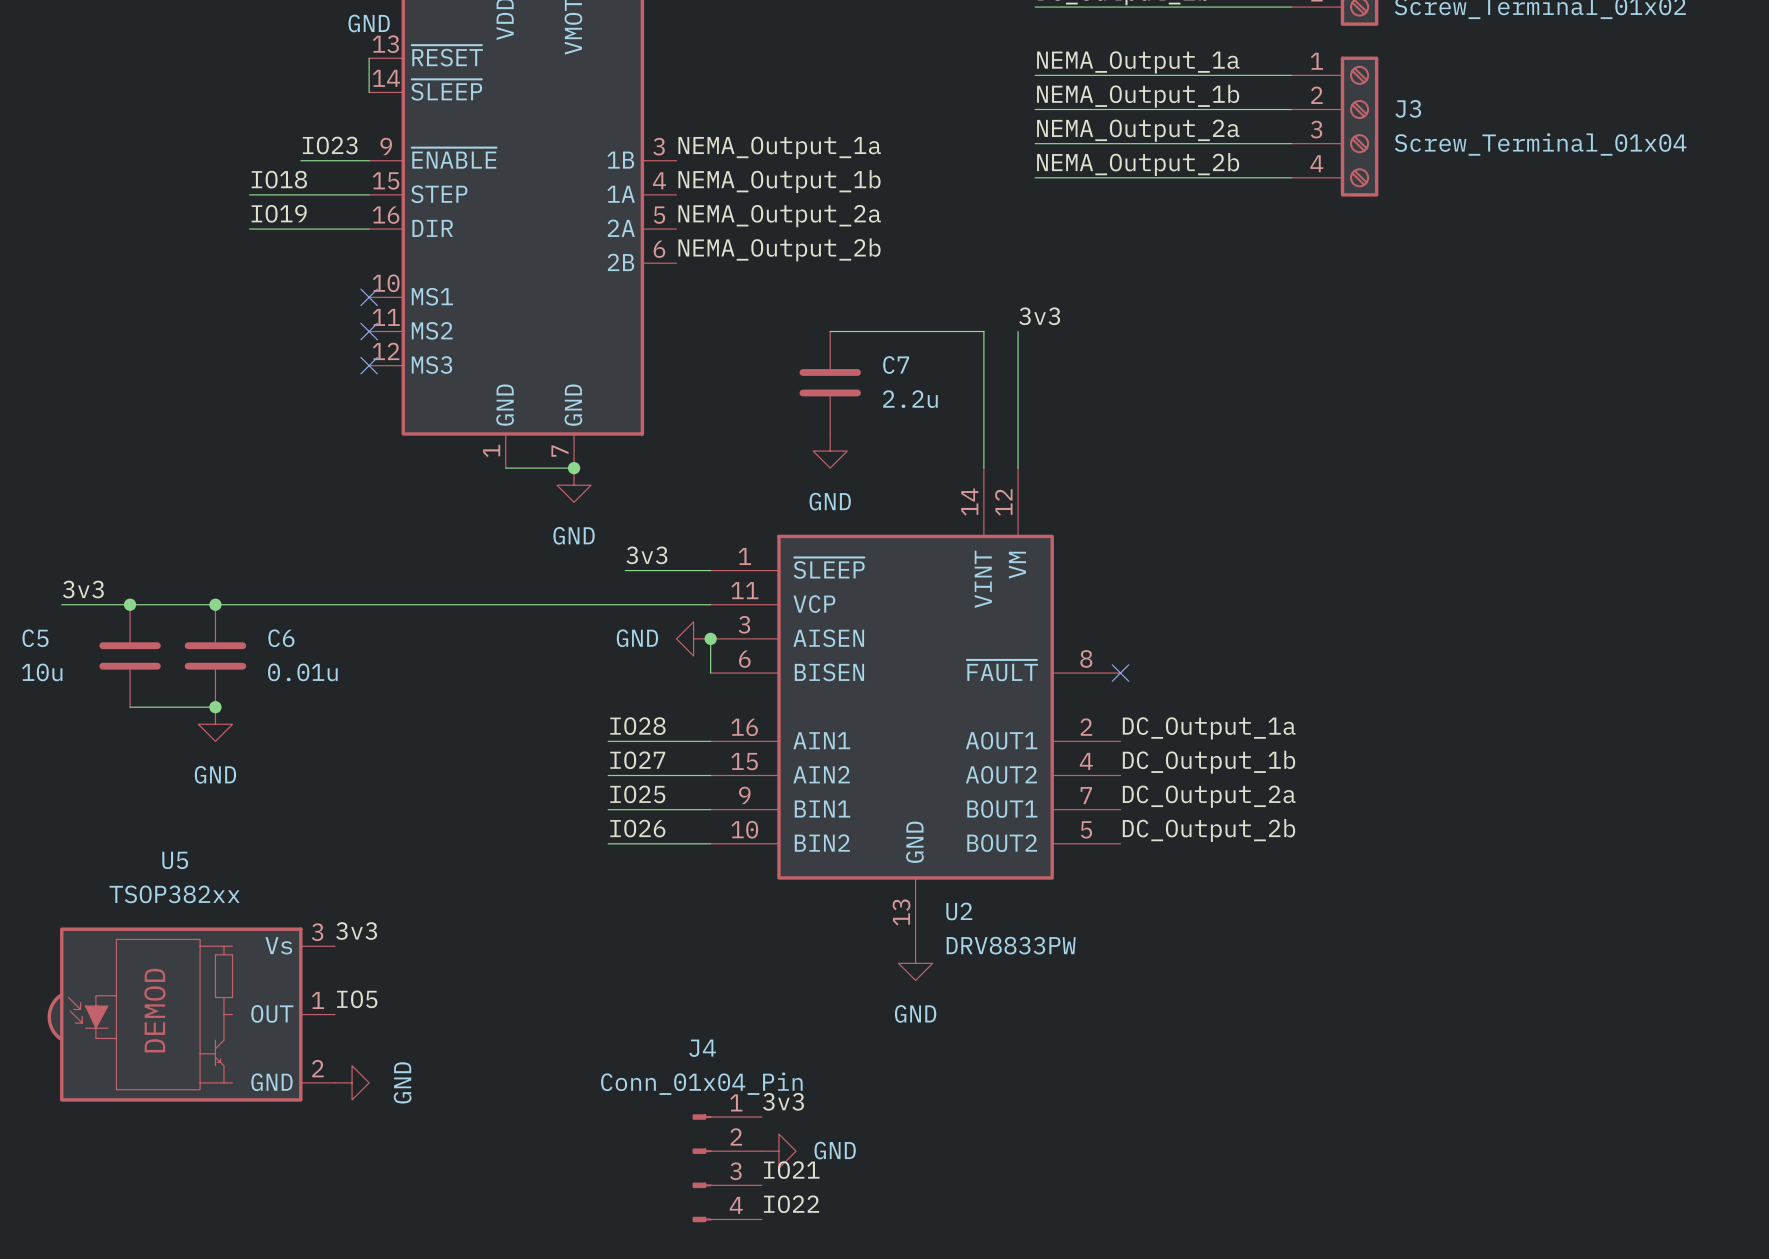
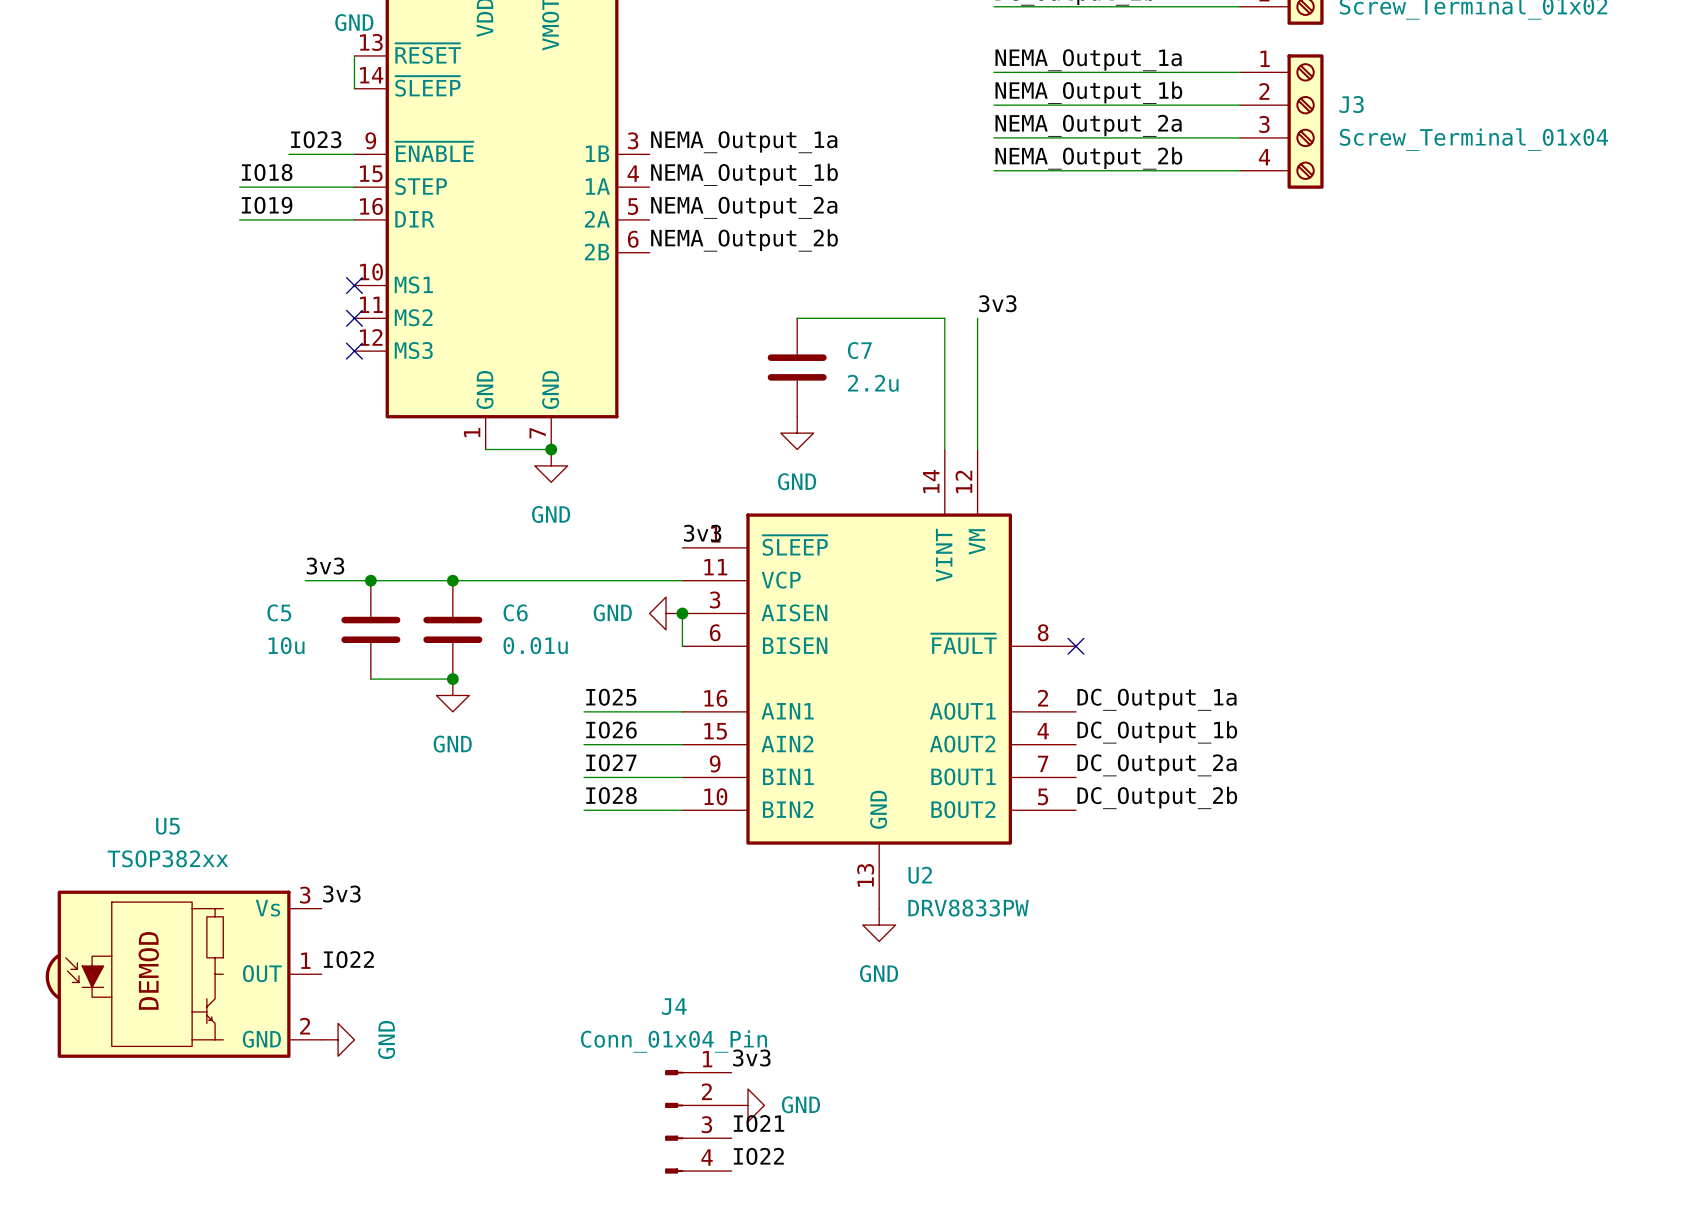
label position: 3v3 (646, 555) -> 3v3 (702, 533)
wire: (625, 570) (710, 570) -> none
label: 3v3 (83, 589) -> none
label: none -> 3v3 (325, 566)
wire: (61, 604) (317, 604) -> none
junction: (130, 604) -> none
junction: (215, 604) -> none
junction: none -> (370, 580)
junction: none -> (452, 580)
C5 position: (130, 655) -> (370, 629)
C6 position: (215, 655) -> (452, 629)
wire: (130, 707) (215, 707) -> (370, 679) (452, 679)
junction: (215, 707) -> none
junction: none -> (452, 679)
power symbol position: GND (215, 724) -> GND (452, 695)
label: IO28 (637, 726) -> IO25 (611, 697)
label: IO27 (637, 760) -> IO26 (611, 730)
label: IO25 (637, 794) -> IO27 (611, 762)
label: IO26 (637, 828) -> IO28 (611, 795)
label: IO5 (357, 999) -> IO22 (348, 959)

